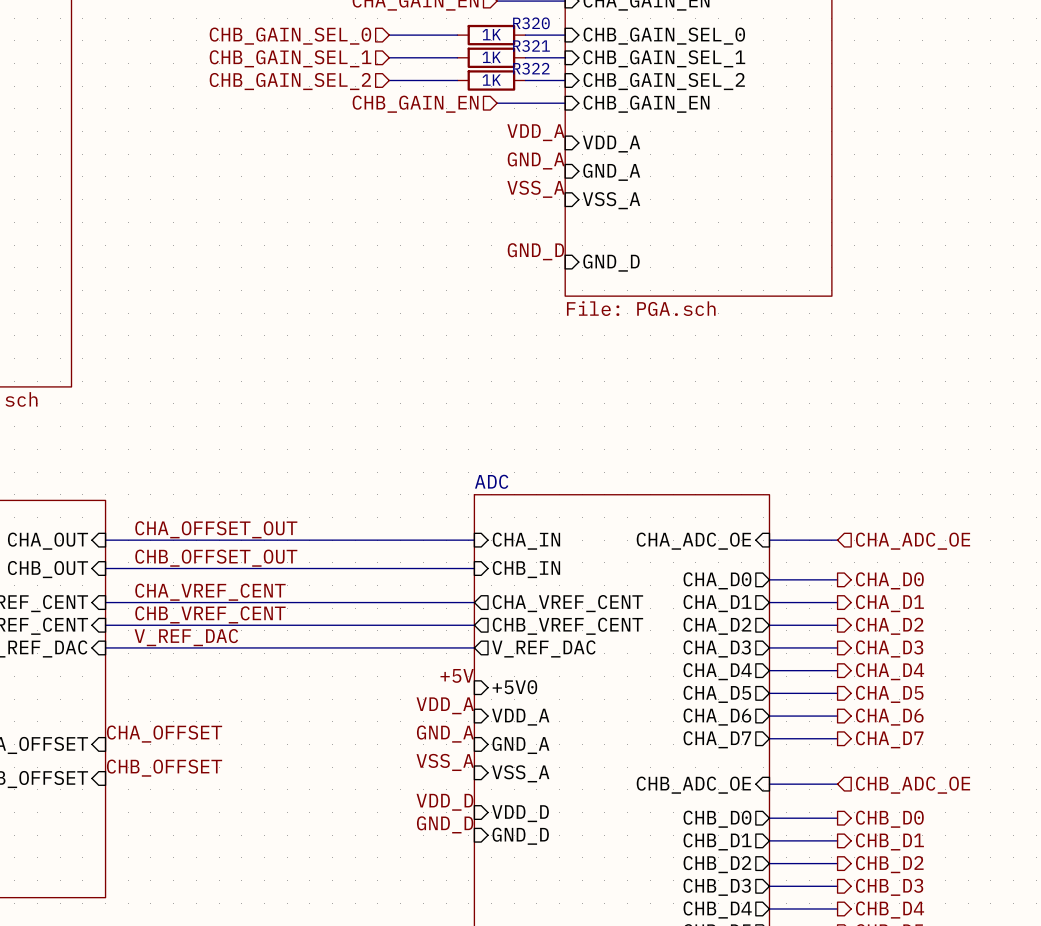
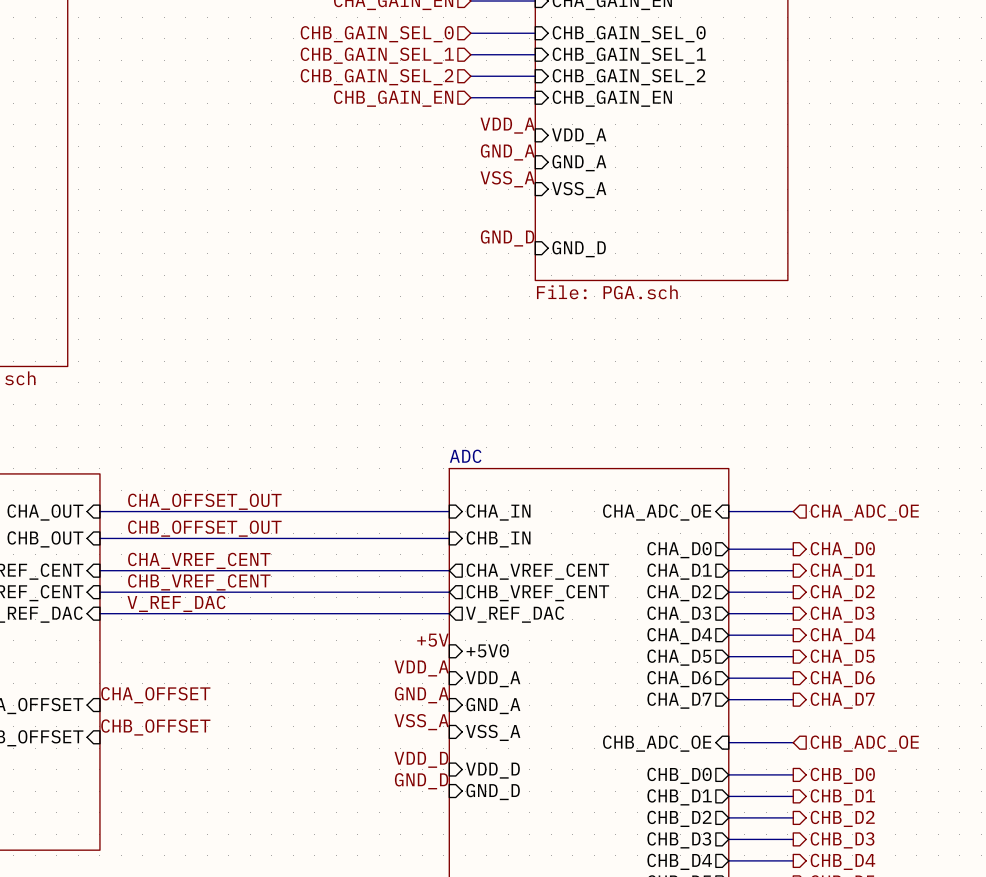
wire: (389, 35) (457, 35) -> none
R320: 1K (491, 35) -> none
wire: none -> (470, 33) (497, 33)
hierarchical label position: CHB_GAIN_SEL_0 (290, 36) -> CHB_GAIN_SEL_0 (377, 34)
wire: (389, 57) (457, 57) -> none
R321: 1K (491, 57) -> none
wire: none -> (470, 54) (497, 54)
hierarchical label position: CHB_GAIN_SEL_1 (290, 58) -> CHB_GAIN_SEL_1 (377, 55)
wire: (389, 80) (457, 80) -> none
R322: 1K (491, 80) -> none
wire: none -> (470, 76) (497, 76)
hierarchical label position: CHB_GAIN_SEL_2 (290, 81) -> CHB_GAIN_SEL_2 (377, 77)

